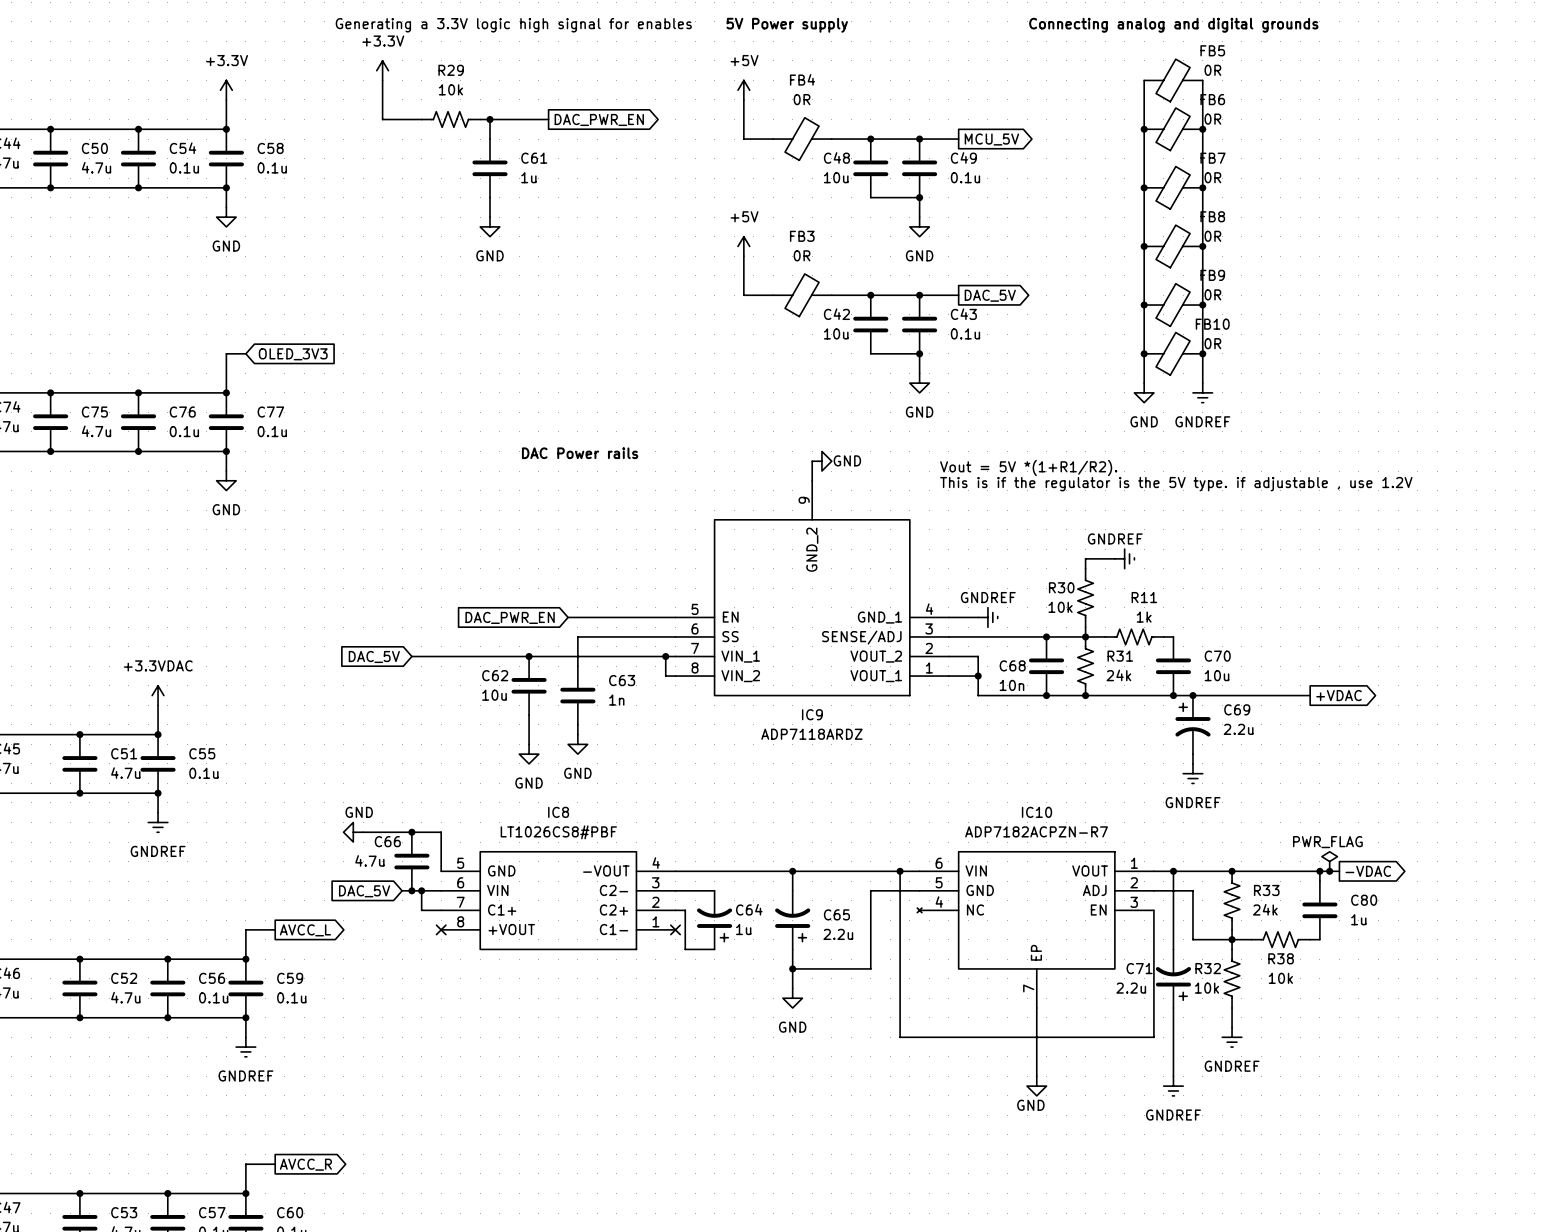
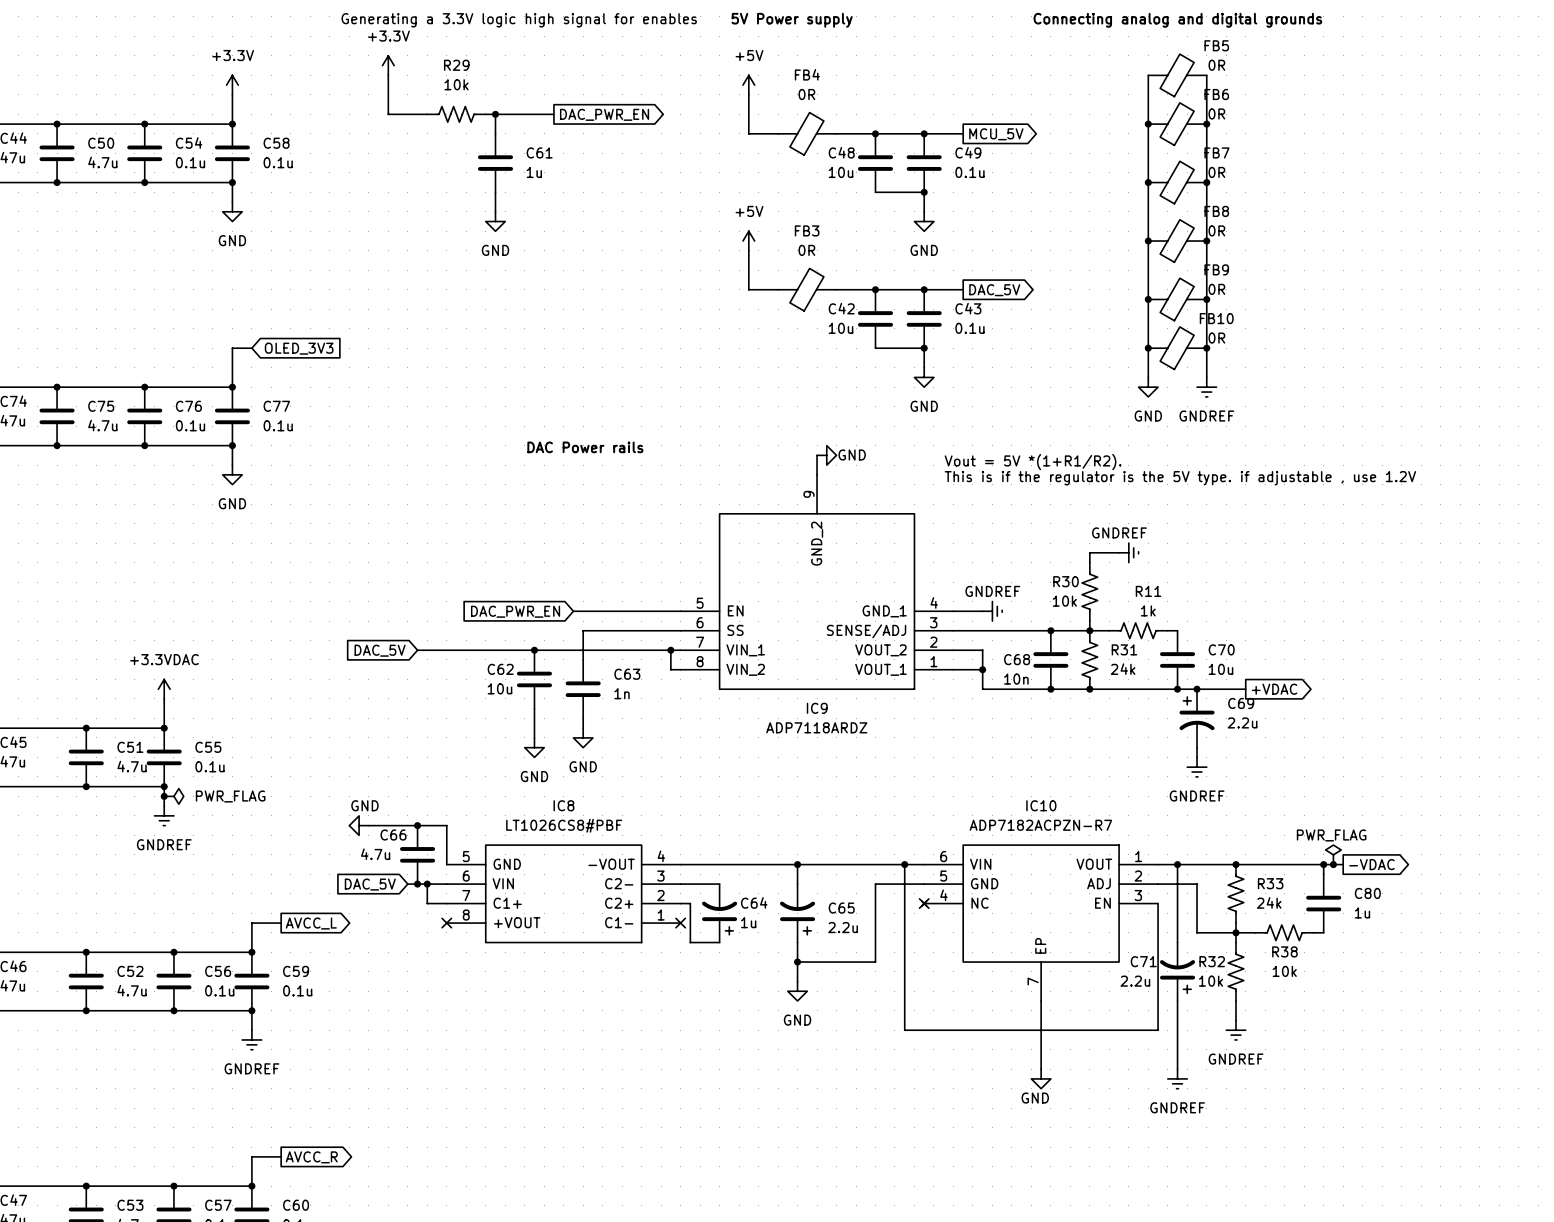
wire: (1241, 695) (1310, 695) -> none
global label position: +VDAC (1338, 695) -> +VDAC (1274, 689)
junction: none -> (164, 796)
power symbol: none -> PWR_FLAG (173, 796)
no-connect mark: none -> (924, 903)

